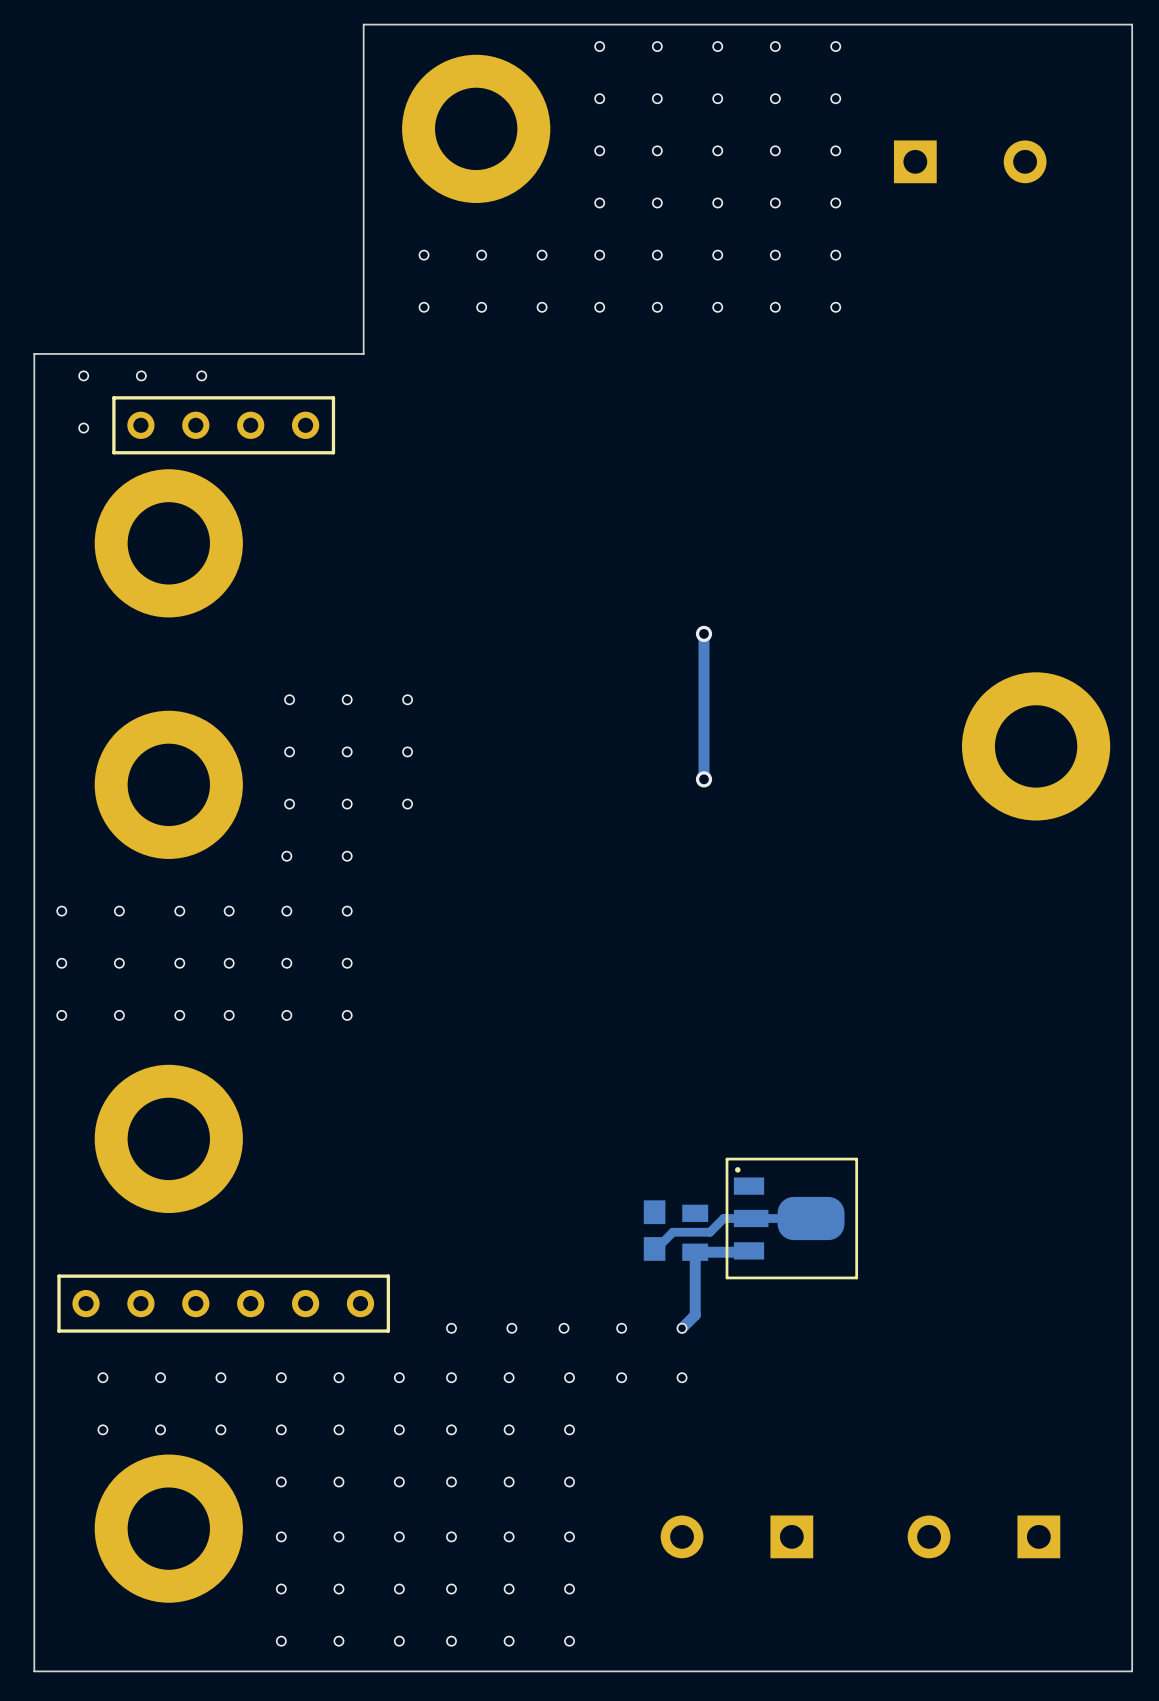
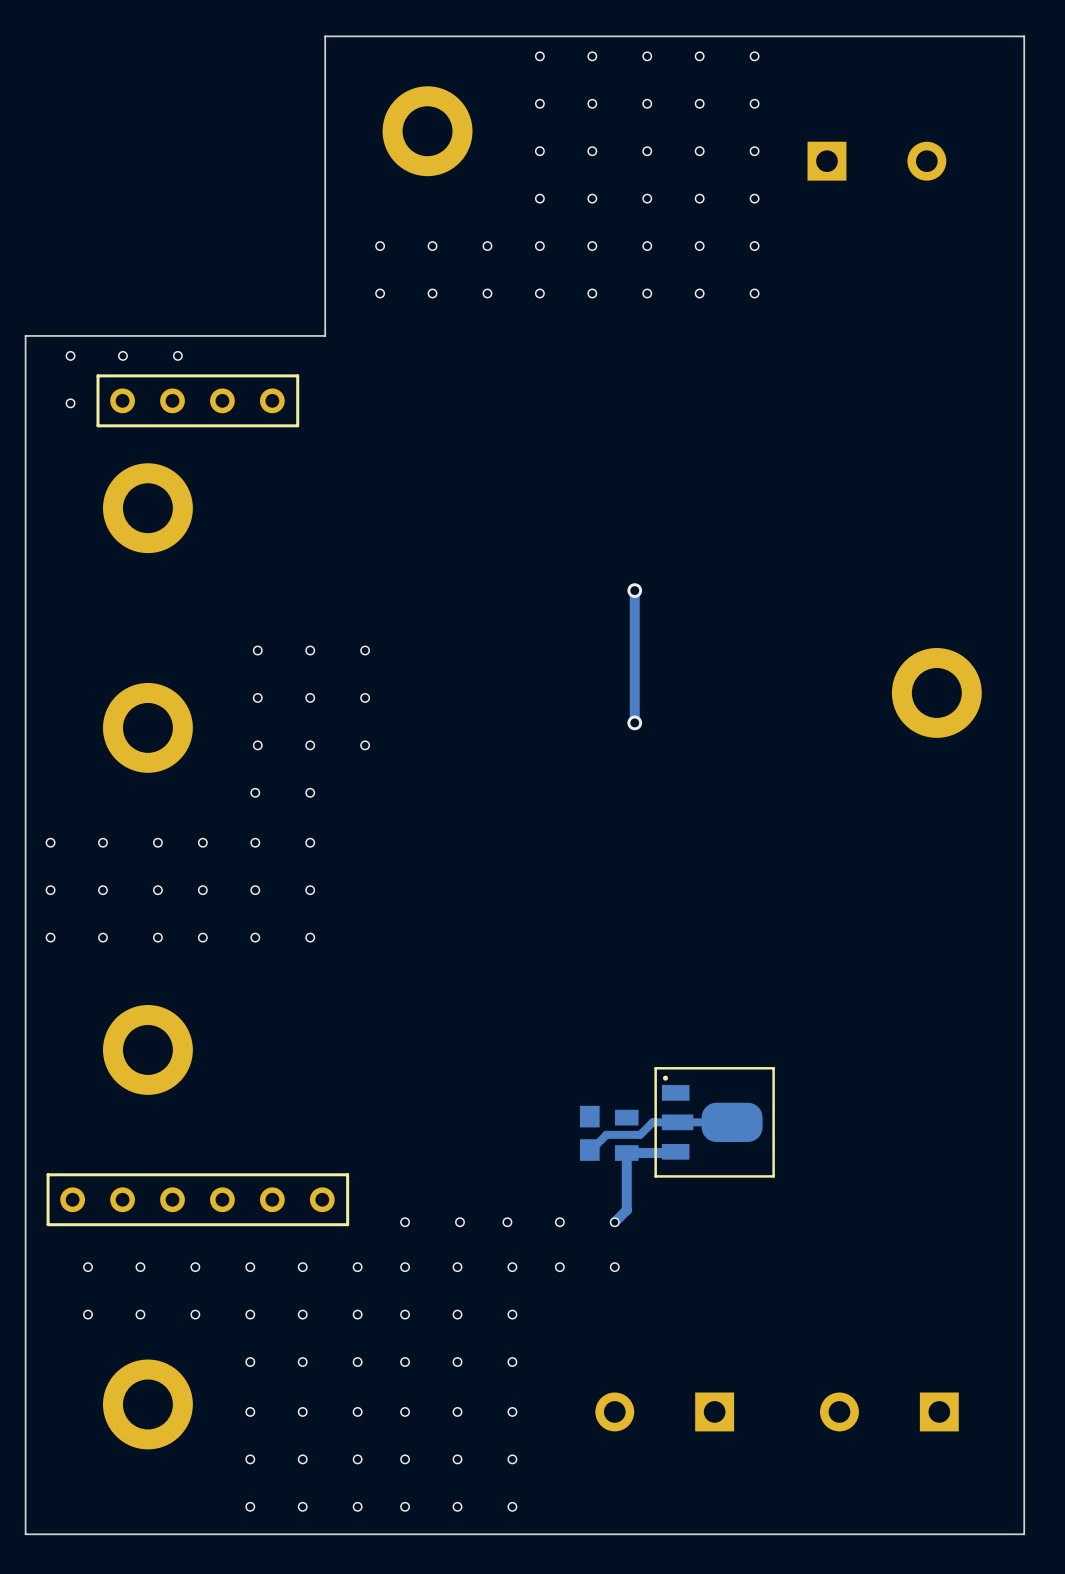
part footprint: [402, 54, 551, 203] -> [382, 86, 473, 177]
part footprint: [94, 469, 243, 618] -> [102, 463, 193, 554]
part footprint: [961, 672, 1111, 821] -> [891, 648, 982, 738]
part footprint: [94, 710, 243, 859] -> [102, 682, 193, 773]
part footprint: [94, 1064, 243, 1214] -> [102, 1005, 193, 1095]
part footprint: [94, 1454, 243, 1603] -> [102, 1359, 193, 1450]

